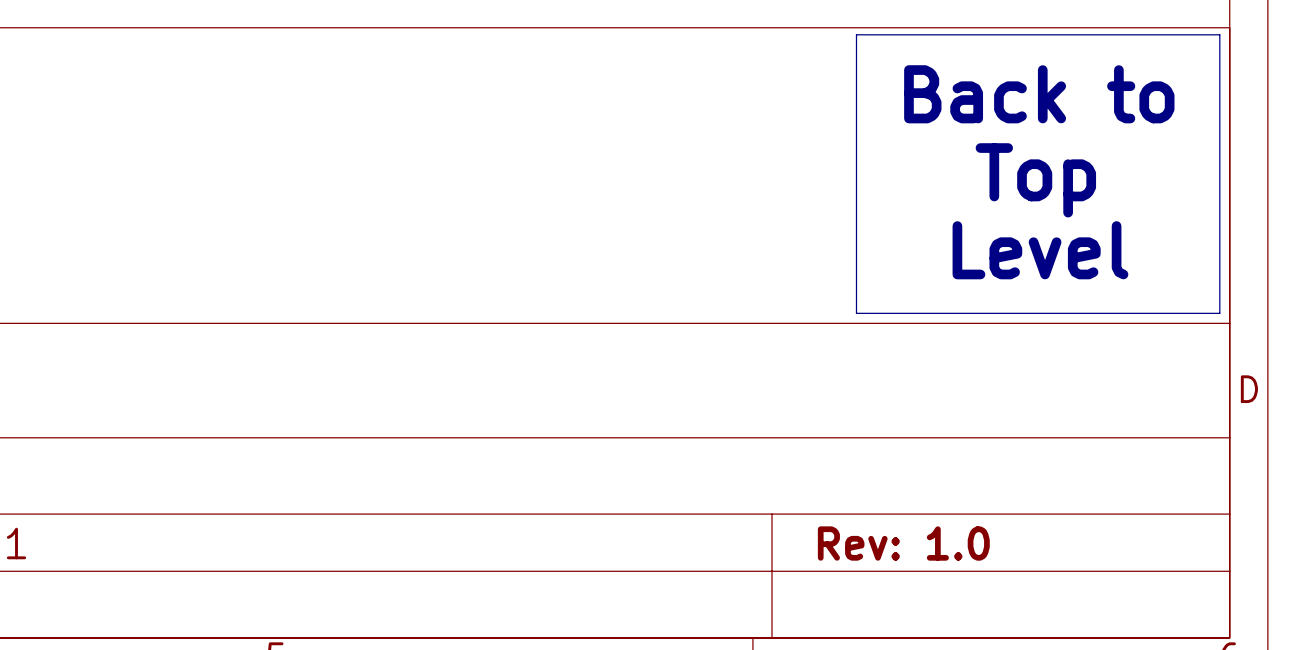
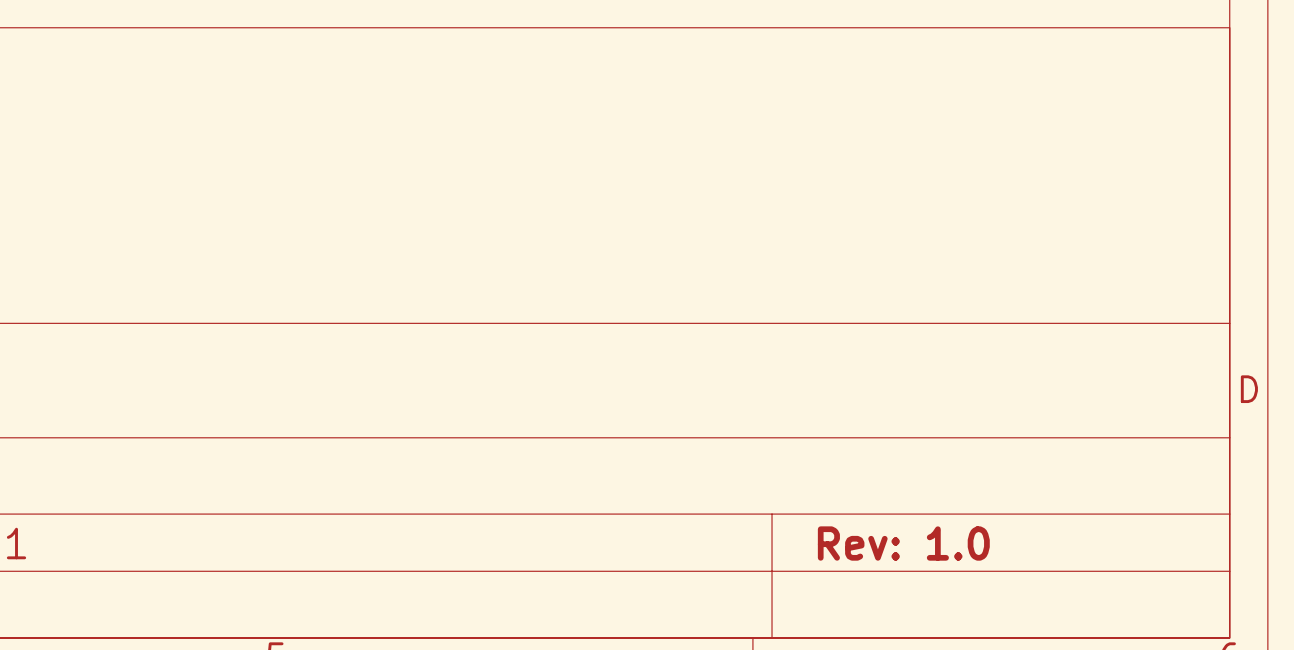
line: (856, 34) (1219, 34) (1219, 313) (856, 313) (856, 34) -> none
text: Back to (1039, 94) -> none
text: Top (1035, 180) -> none
text: Level (1040, 250) -> none

